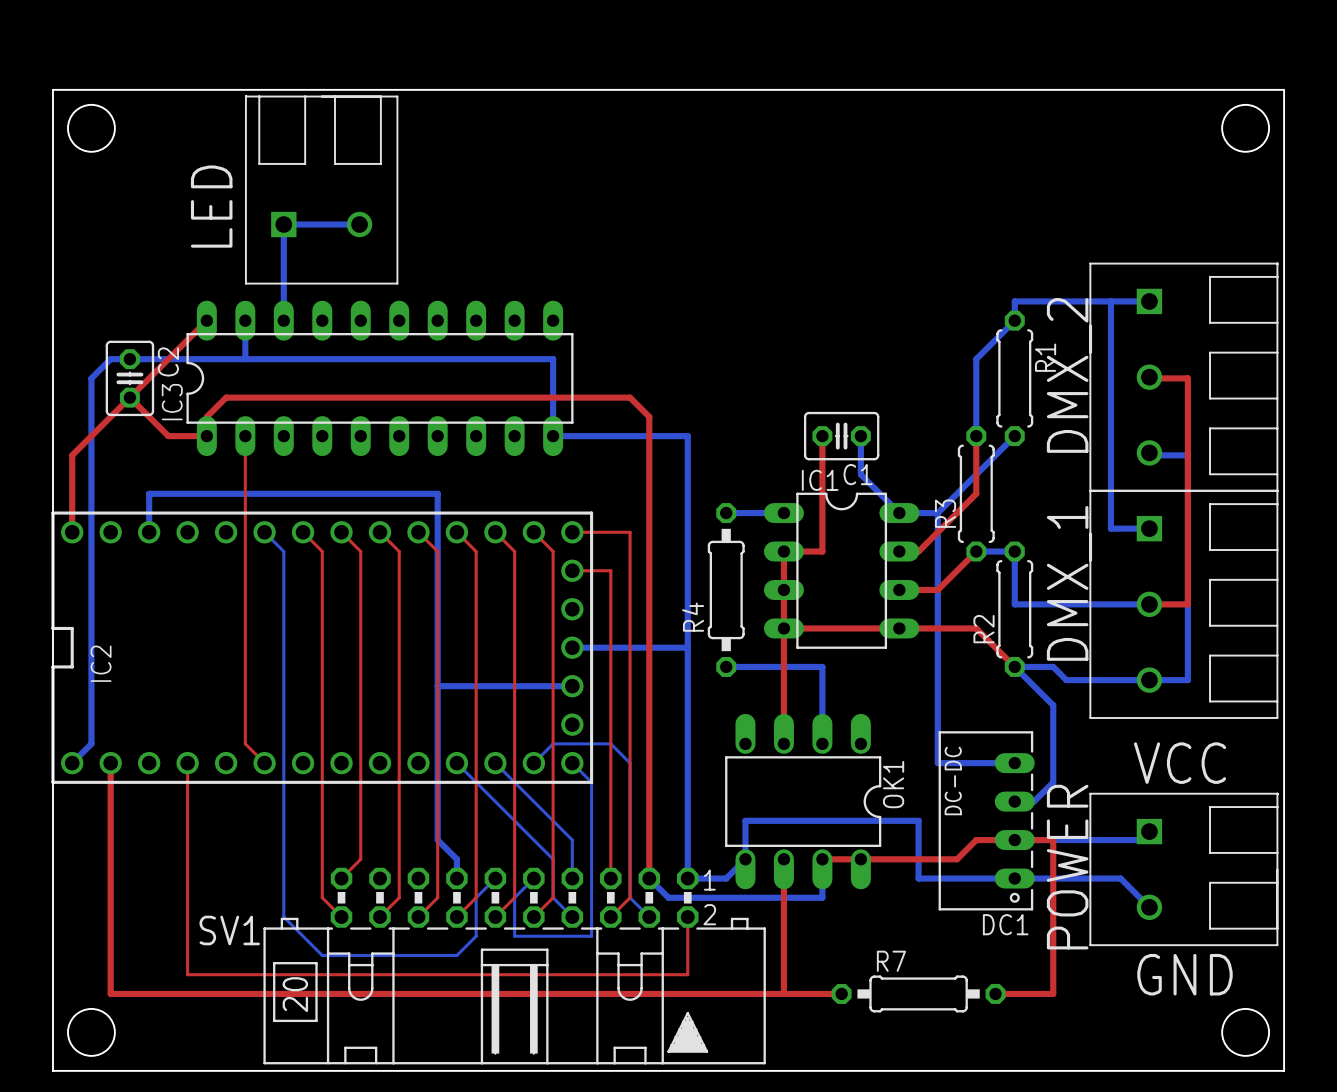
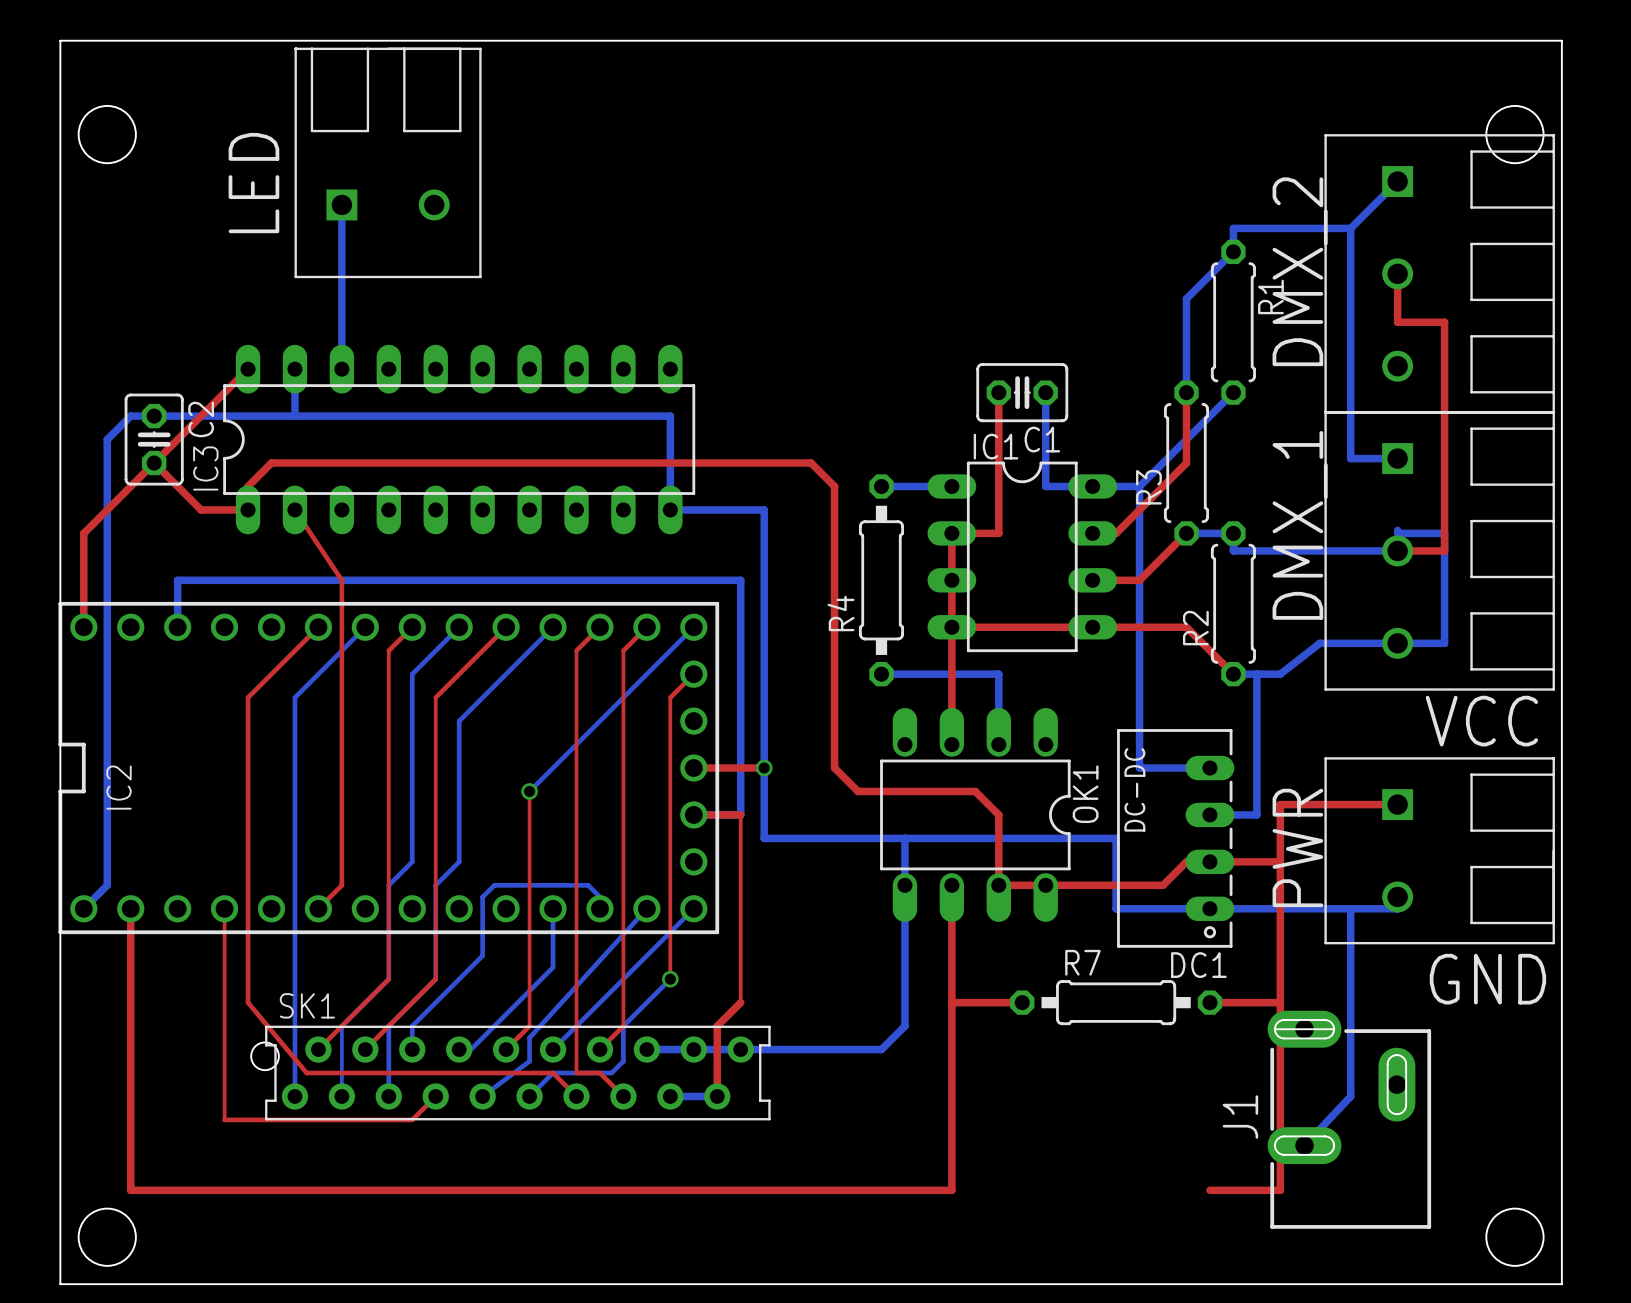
board edge: (52, 89) (1284, 89) -> (60, 87) (60, 40) (1561, 40) (1561, 87)
bottom track: none -> (1397, 181) (1350, 228)
LED position: (321, 189) -> (388, 162)
bottom track: none -> (1350, 228) (1350, 345)
bottom track: none -> (1350, 228) (1233, 228) (1233, 251) (1186, 298) (1186, 392)
bottom track: (283, 224) (359, 224) -> (341, 251) (341, 204)
bottom track: (1149, 301) (1014, 301) (1014, 320) (976, 359) (976, 436) -> none
top track: none -> (998, 392) (998, 509)
bottom track: none -> (1045, 392) (1045, 486) (1139, 486)
bottom track: none -> (1233, 392) (1139, 486)
top track: (1149, 377) (1187, 378) -> (1397, 273) (1397, 322) (1444, 322) (1444, 439)
DMX_2 position: (1183, 377) -> (1439, 273)
R1 position: (1014, 378) -> (1233, 322)
bottom track: (1110, 394) (1110, 528) (1149, 528) -> (1350, 458) (1397, 458)
top track: (630, 397) (649, 416) (649, 878) -> (764, 463) (811, 463) (834, 486) (834, 768) (858, 791) (975, 791) (998, 814) (998, 885) (1163, 885) (1186, 861) (1280, 861)
bottom track: none -> (1139, 486) (1139, 603)
top track: (245, 436) (245, 743) (264, 763) -> (294, 509) (341, 580) (341, 885) (318, 908)
bottom track: (630, 436) (687, 436) (687, 878) -> (764, 509) (764, 838) (1116, 838) (1116, 908) (1139, 908)
C1 position: (841, 436) -> (1022, 392)
bottom track: (860, 436) (860, 474) (899, 513) (937, 513) (1014, 436) -> none
top track: (976, 436) (976, 493) (918, 551) (899, 551) -> (1186, 392) (1186, 463) (1116, 533) (1092, 533)
top track: (822, 455) (822, 551) (783, 551) -> (998, 533) (951, 533) (951, 650)
bottom track: none -> (1186, 533) (1233, 533) (1233, 550) (1397, 550)
top track: (1187, 469) (1187, 604) (1149, 604) -> (1444, 550) (1397, 550)
bottom track: (437, 493) (437, 840) (456, 859) (456, 878) -> none
R3 position: (976, 493) -> (1186, 463)
bottom track: (726, 513) (783, 513) -> (881, 486) (951, 486)
bottom track: (264, 532) (283, 551) (283, 859) -> (459, 627) (412, 674) (412, 861) (388, 885) (388, 979) (341, 1026)
top track: none -> (318, 627) (248, 697) (248, 1002) (306, 1073) (553, 1073) (576, 1096)
bottom track: none -> (365, 627) (294, 697) (294, 1096)
top track: (303, 532) (322, 551) -> (412, 627) (388, 650)
top track: (341, 532) (360, 551) (360, 589) -> (506, 627) (435, 697)
top track: (379, 532) (399, 551) (399, 897) (379, 917) -> none
top track: (418, 532) (437, 551) (437, 666) -> none
bottom track: none -> (553, 627) (459, 721) (459, 861) (435, 885) (435, 979) (388, 1026) (388, 1096)
top track: (456, 532) (476, 551) -> (599, 627) (576, 650)
top track: (495, 532) (514, 551) -> (646, 627) (623, 650)
top track: (533, 532) (553, 551) (553, 589) -> (693, 674) (670, 697)
bottom track: none -> (693, 627) (529, 791)
top track: (572, 532) (630, 532) (630, 897) (610, 917) -> none
top track: none -> (951, 627) (1186, 627) (1233, 674)
bottom track: (1187, 545) (1187, 680) (1066, 680) (1053, 666) (1014, 666) (1053, 705) (1053, 782) (1034, 801) (1014, 801) -> (1444, 643) (1319, 643) (1280, 674) (1233, 674)
bottom track: (976, 551) (1014, 551) (1014, 604) (1149, 604) -> none
top track: (976, 551) (937, 589) (899, 589) -> (1186, 533) (1139, 580) (1092, 580)
top track: (572, 570) (610, 570) (610, 686) -> (693, 814) (740, 814)
bottom track: none -> (881, 674) (998, 674) (998, 744)
IC1 position: (841, 570) -> (1022, 556)
bottom track: none -> (1256, 674) (1256, 814) (1209, 814)
R4 position: (726, 589) -> (881, 580)
DMX_1 position: (1183, 604) -> (1439, 550)
R2 position: (1014, 609) -> (1233, 603)
bottom track: (572, 647) (687, 647) -> none
top track: none -> (693, 768) (764, 768)
via: none -> (764, 768)
bottom track: (937, 647) (937, 763) -> (1139, 768) (1209, 768)
via: none -> (529, 791)
bottom track: (726, 666) (822, 666) (822, 743) -> none
top track: (1014, 666) (976, 628) (783, 628) (783, 743) -> (951, 1026) (951, 885)
top track: none -> (1397, 804) (1280, 804) (1280, 1002)
bottom track: (437, 686) (572, 686) -> (529, 580) (740, 580) (740, 814) (693, 814)
PWR: none -> (1439, 850)
bottom track: none -> (1397, 896) (1397, 908) (1233, 908)
bottom track: (456, 763) (553, 859) (553, 897) (572, 917) -> (553, 908) (553, 967) (470, 1049) (459, 1049)
bottom track: (495, 763) (572, 840) (572, 878) -> (599, 908) (599, 897) (588, 885) (494, 885) (482, 897) (482, 955) (412, 1026) (412, 1049)
bottom track: (533, 763) (553, 743) (610, 743) (630, 763) (630, 897) (649, 917) -> (646, 908) (529, 1037) (529, 1061) (482, 1096)
bottom track: (572, 763) (591, 782) (591, 936) (514, 936) (514, 897) (533, 878) -> (693, 908) (553, 1049)
bottom track: none -> (1350, 908) (1350, 1096) (1304, 1145)
text position: VCC (1180, 763) -> VCC (1481, 721)
OK1 position: (803, 801) -> (975, 814)
top track: (322, 820) (322, 897) (341, 917) -> (388, 979) (318, 1049)
top track: (360, 820) (360, 859) (341, 878) -> (435, 979) (365, 1049)
bottom track: none -> (670, 979) (623, 1026) (623, 1061) (611, 1073) (553, 1073) (529, 1096)
top track: (553, 820) (553, 897) (533, 917) -> none
via: none -> (670, 979)
bottom track: (745, 820) (918, 820) (918, 878) (1120, 878) (1149, 907) -> (904, 979) (904, 838)
DC1 position: (986, 820) -> (1175, 838)
bottom track: (1149, 831) (1140, 840) (1014, 840) -> none
top track: (610, 840) (610, 878) -> (740, 1002) (717, 1026) (717, 1096)
top track: (995, 840) (976, 840) (957, 859) (822, 859) -> none
top track: (437, 859) (437, 897) (418, 917) -> (529, 1026) (506, 1049)
top track: (514, 859) (514, 897) (495, 917) -> (623, 1026) (599, 1049)
bottom track: (822, 859) (822, 897) (668, 897) (649, 878) -> none
POWER: (1183, 869) -> none
bottom track: (495, 878) (476, 897) (476, 936) (456, 955) (322, 955) (283, 917) -> none
bottom track: none -> (646, 1049) (834, 1049)
SK1: none -> (510, 1073)
top track: (476, 897) (456, 917) -> (576, 1073) (599, 1073) (623, 1096)
bottom track: none -> (670, 1096) (717, 1096)
top track: (687, 917) (687, 974) (187, 974) (187, 936) -> (435, 1096) (412, 1119) (224, 1119)
J1: none -> (1349, 1119)
SV1: (514, 966) -> none
text position: GND (1184, 974) -> GND (1487, 979)
top track: (783, 993) (841, 993) -> (951, 1002) (1022, 1002)
R7 position: (918, 993) -> (1116, 1002)

